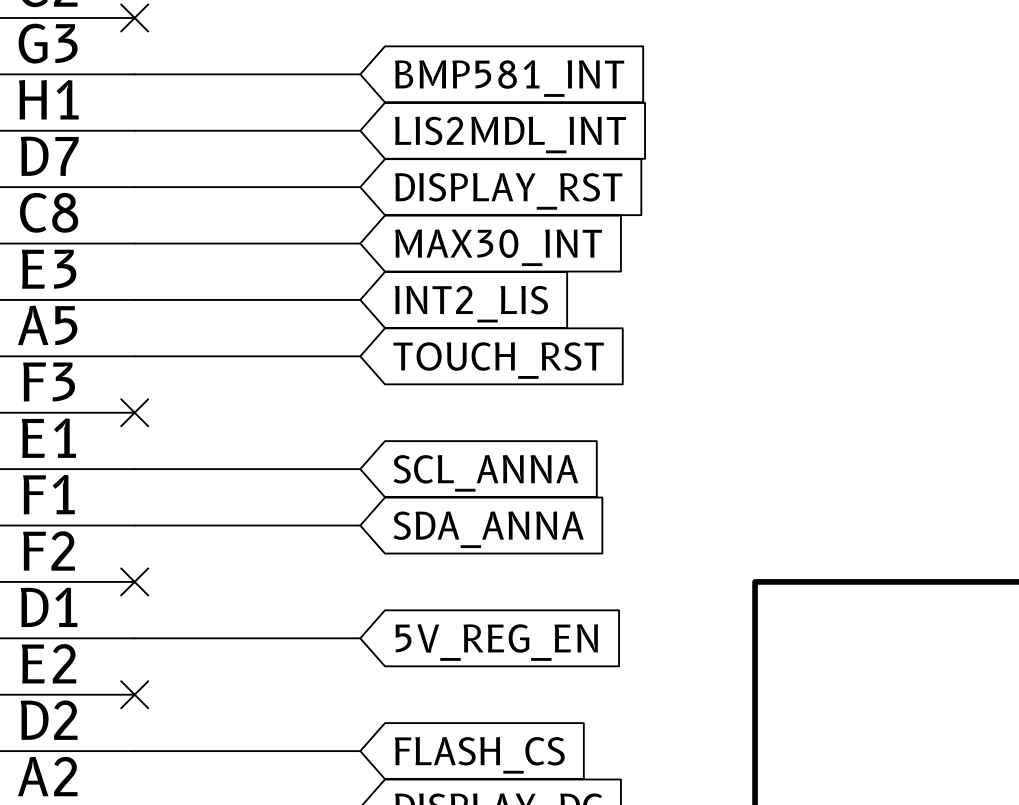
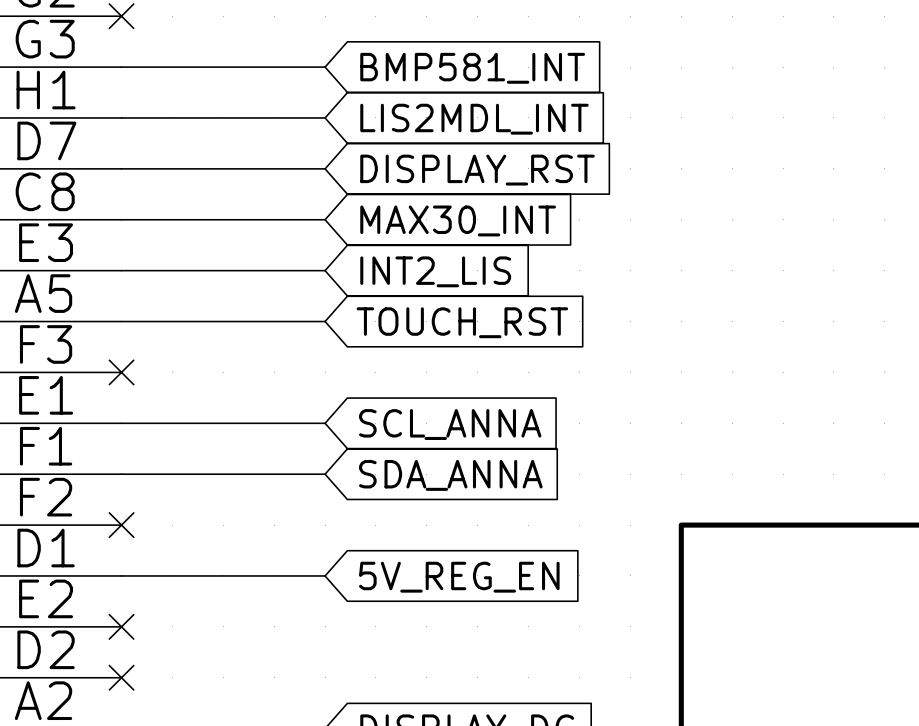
wire: (134, 751) (360, 751) -> none
no-connect mark: none -> (121, 677)
global label: FLASH_CS (479, 755) -> none

